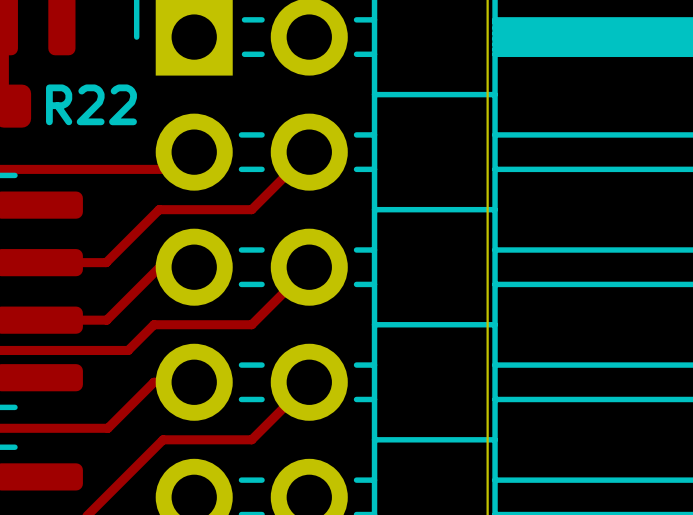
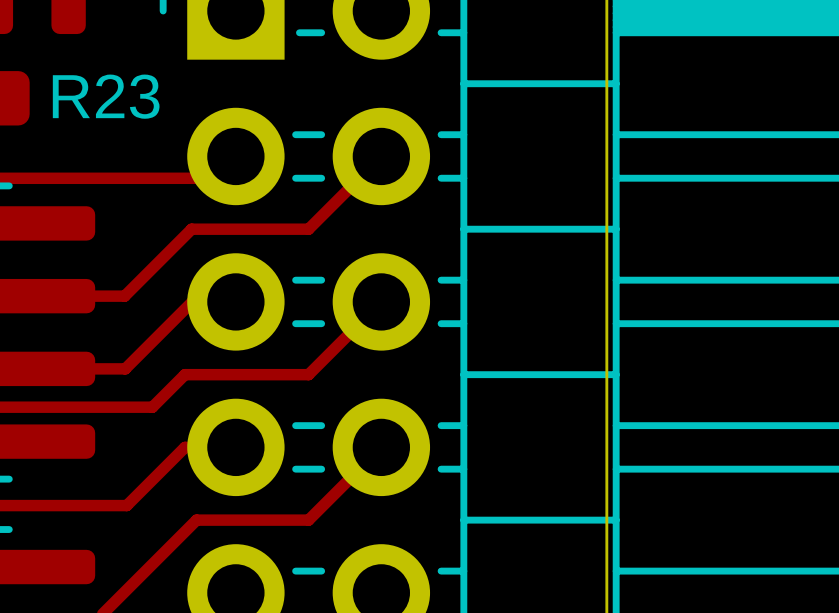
R22 name: R22 (91, 104) -> R23 (106, 96)

